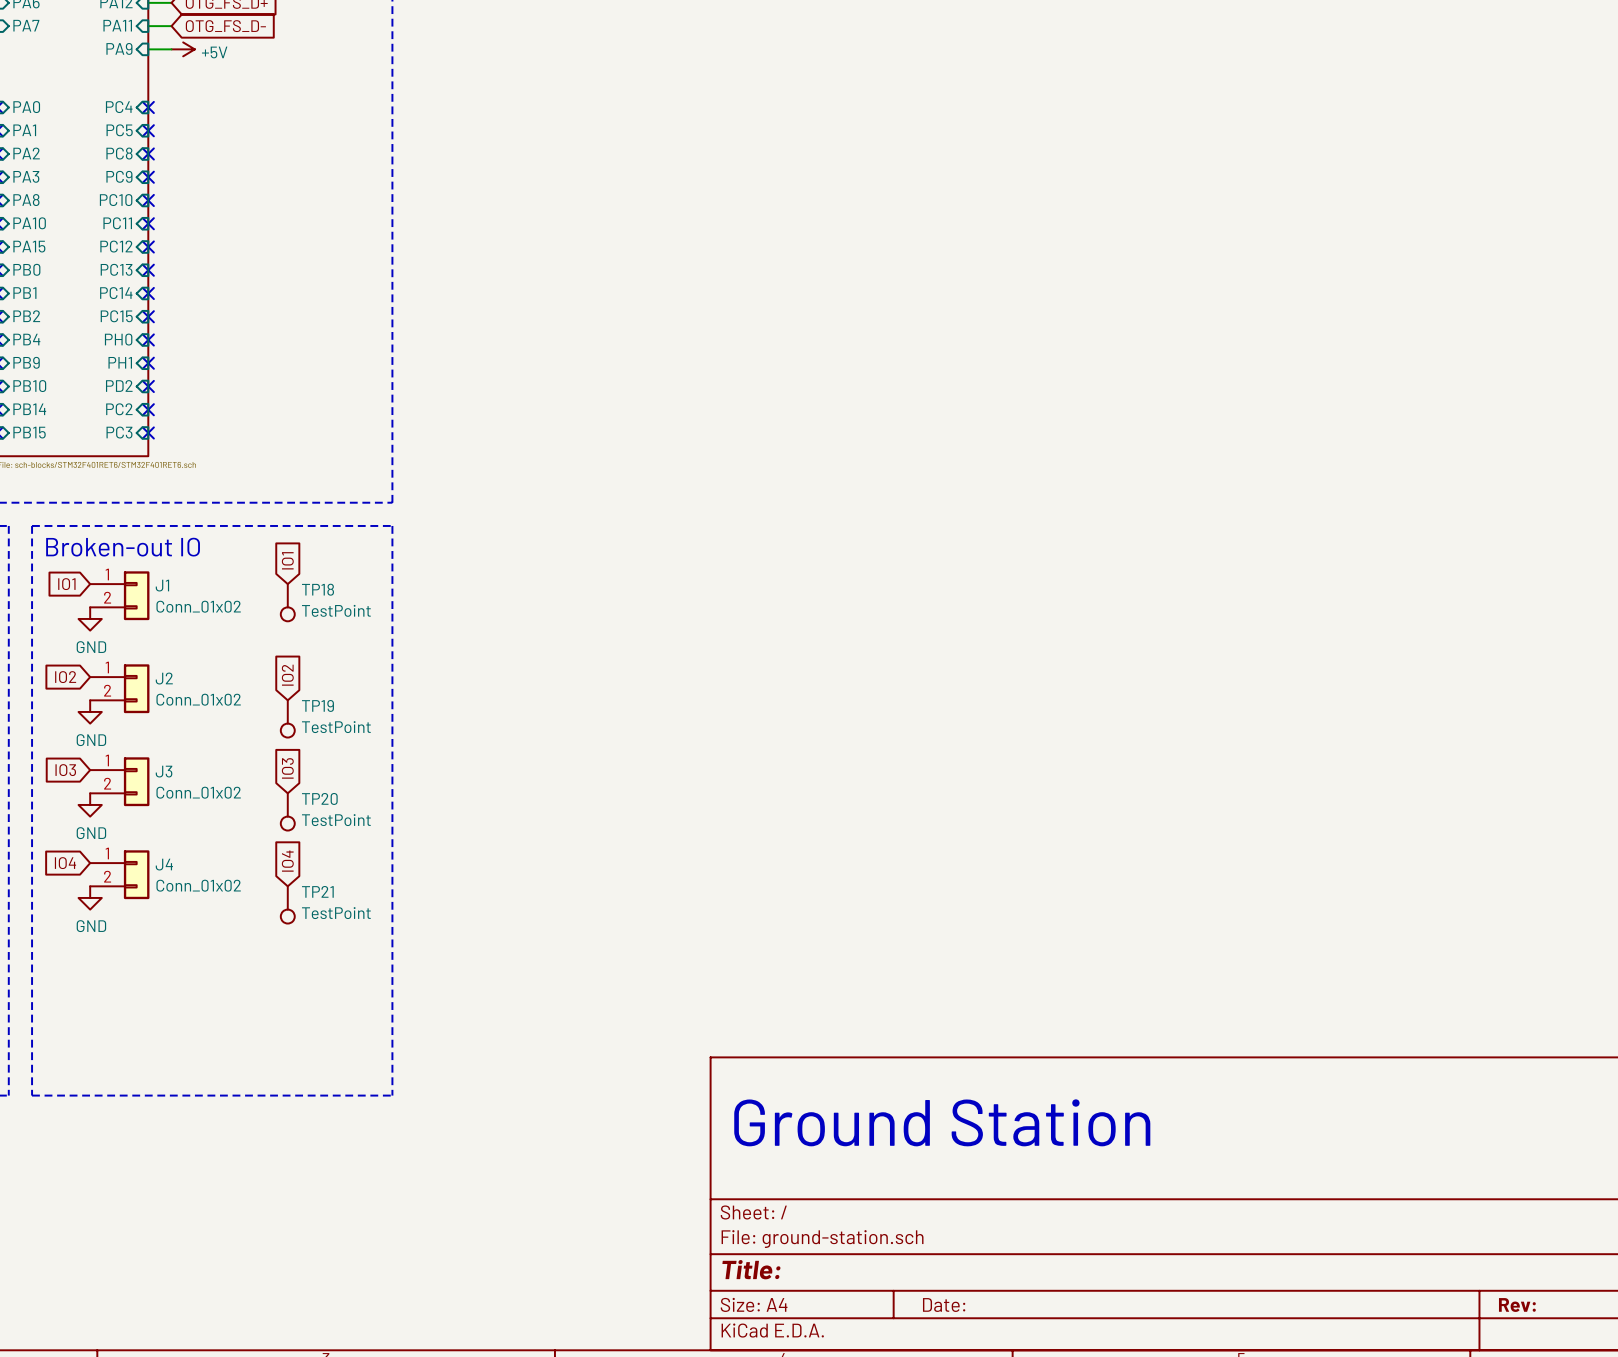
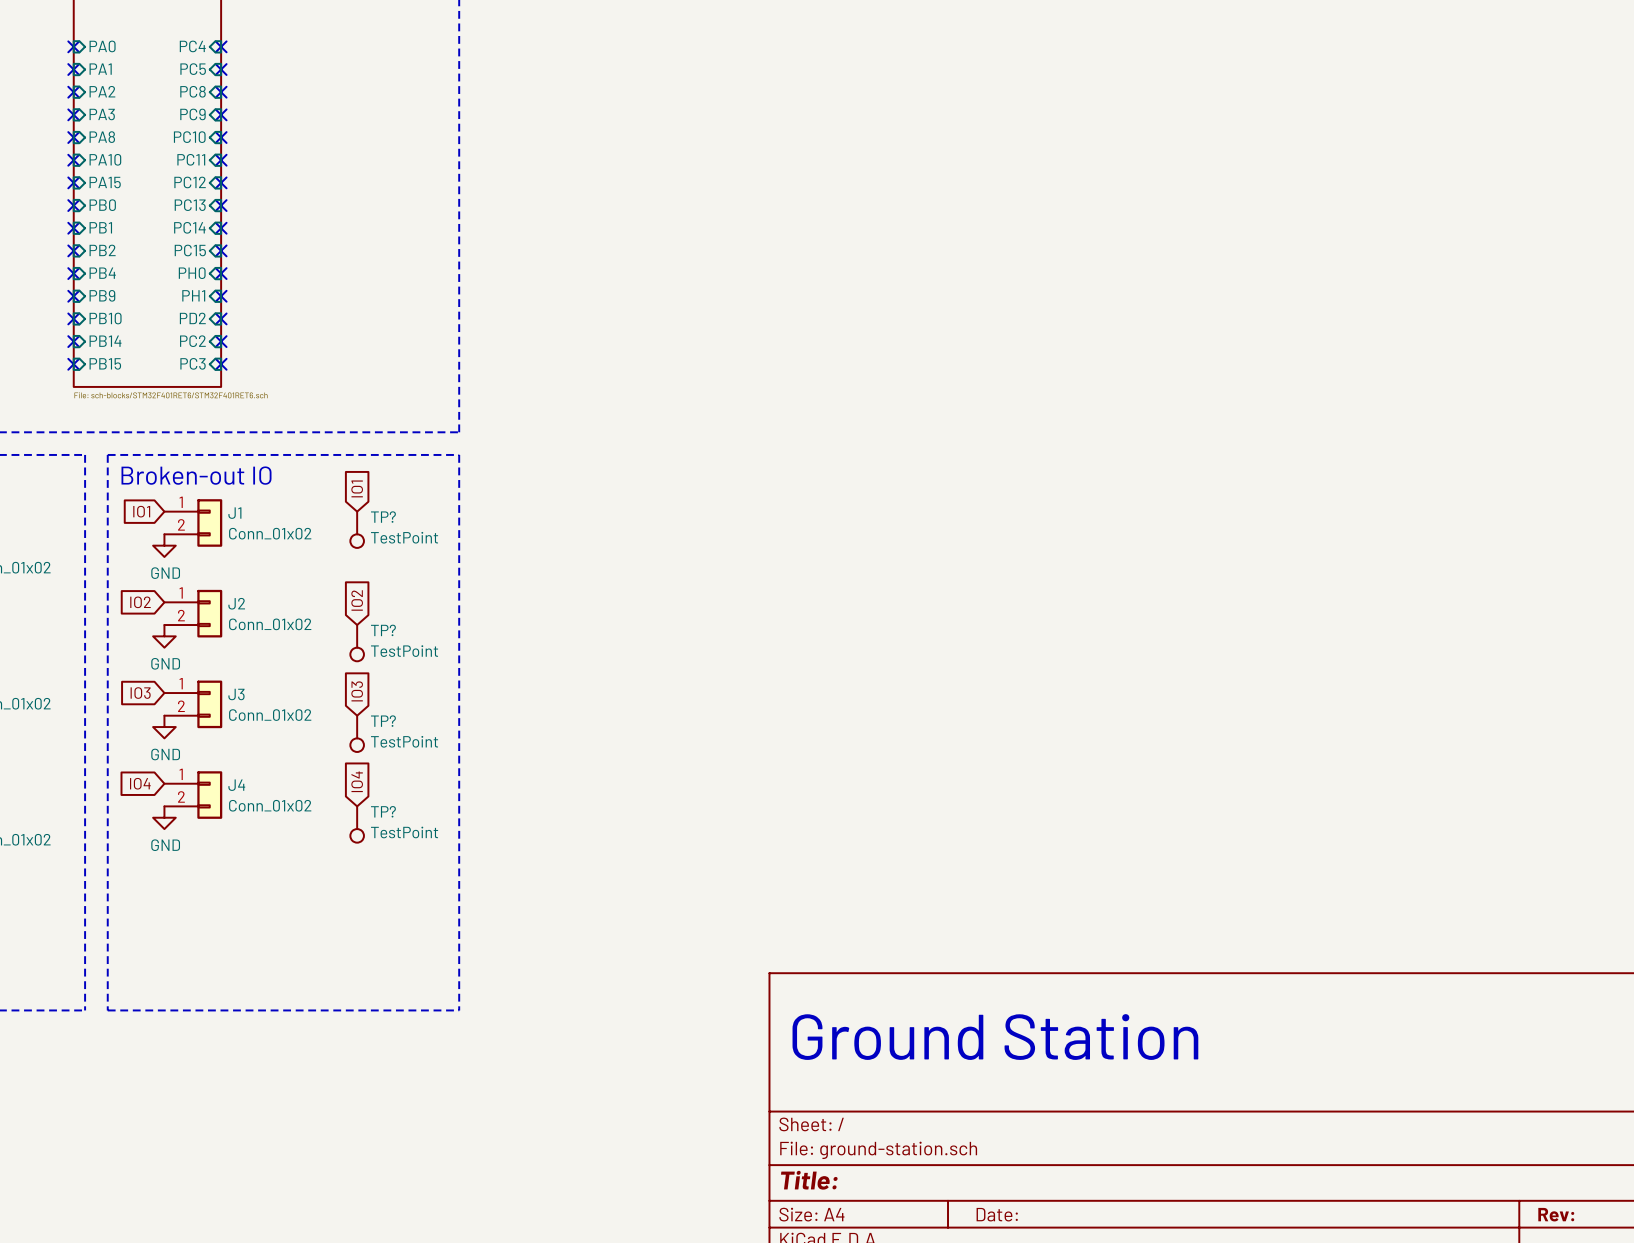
TP18 name: TP18 (317, 589) -> TP? (383, 517)
TP19 name: TP19 (317, 705) -> TP? (383, 630)
TP20 name: TP20 (319, 798) -> TP? (383, 721)
TP21 name: TP21 (317, 891) -> TP? (383, 811)

